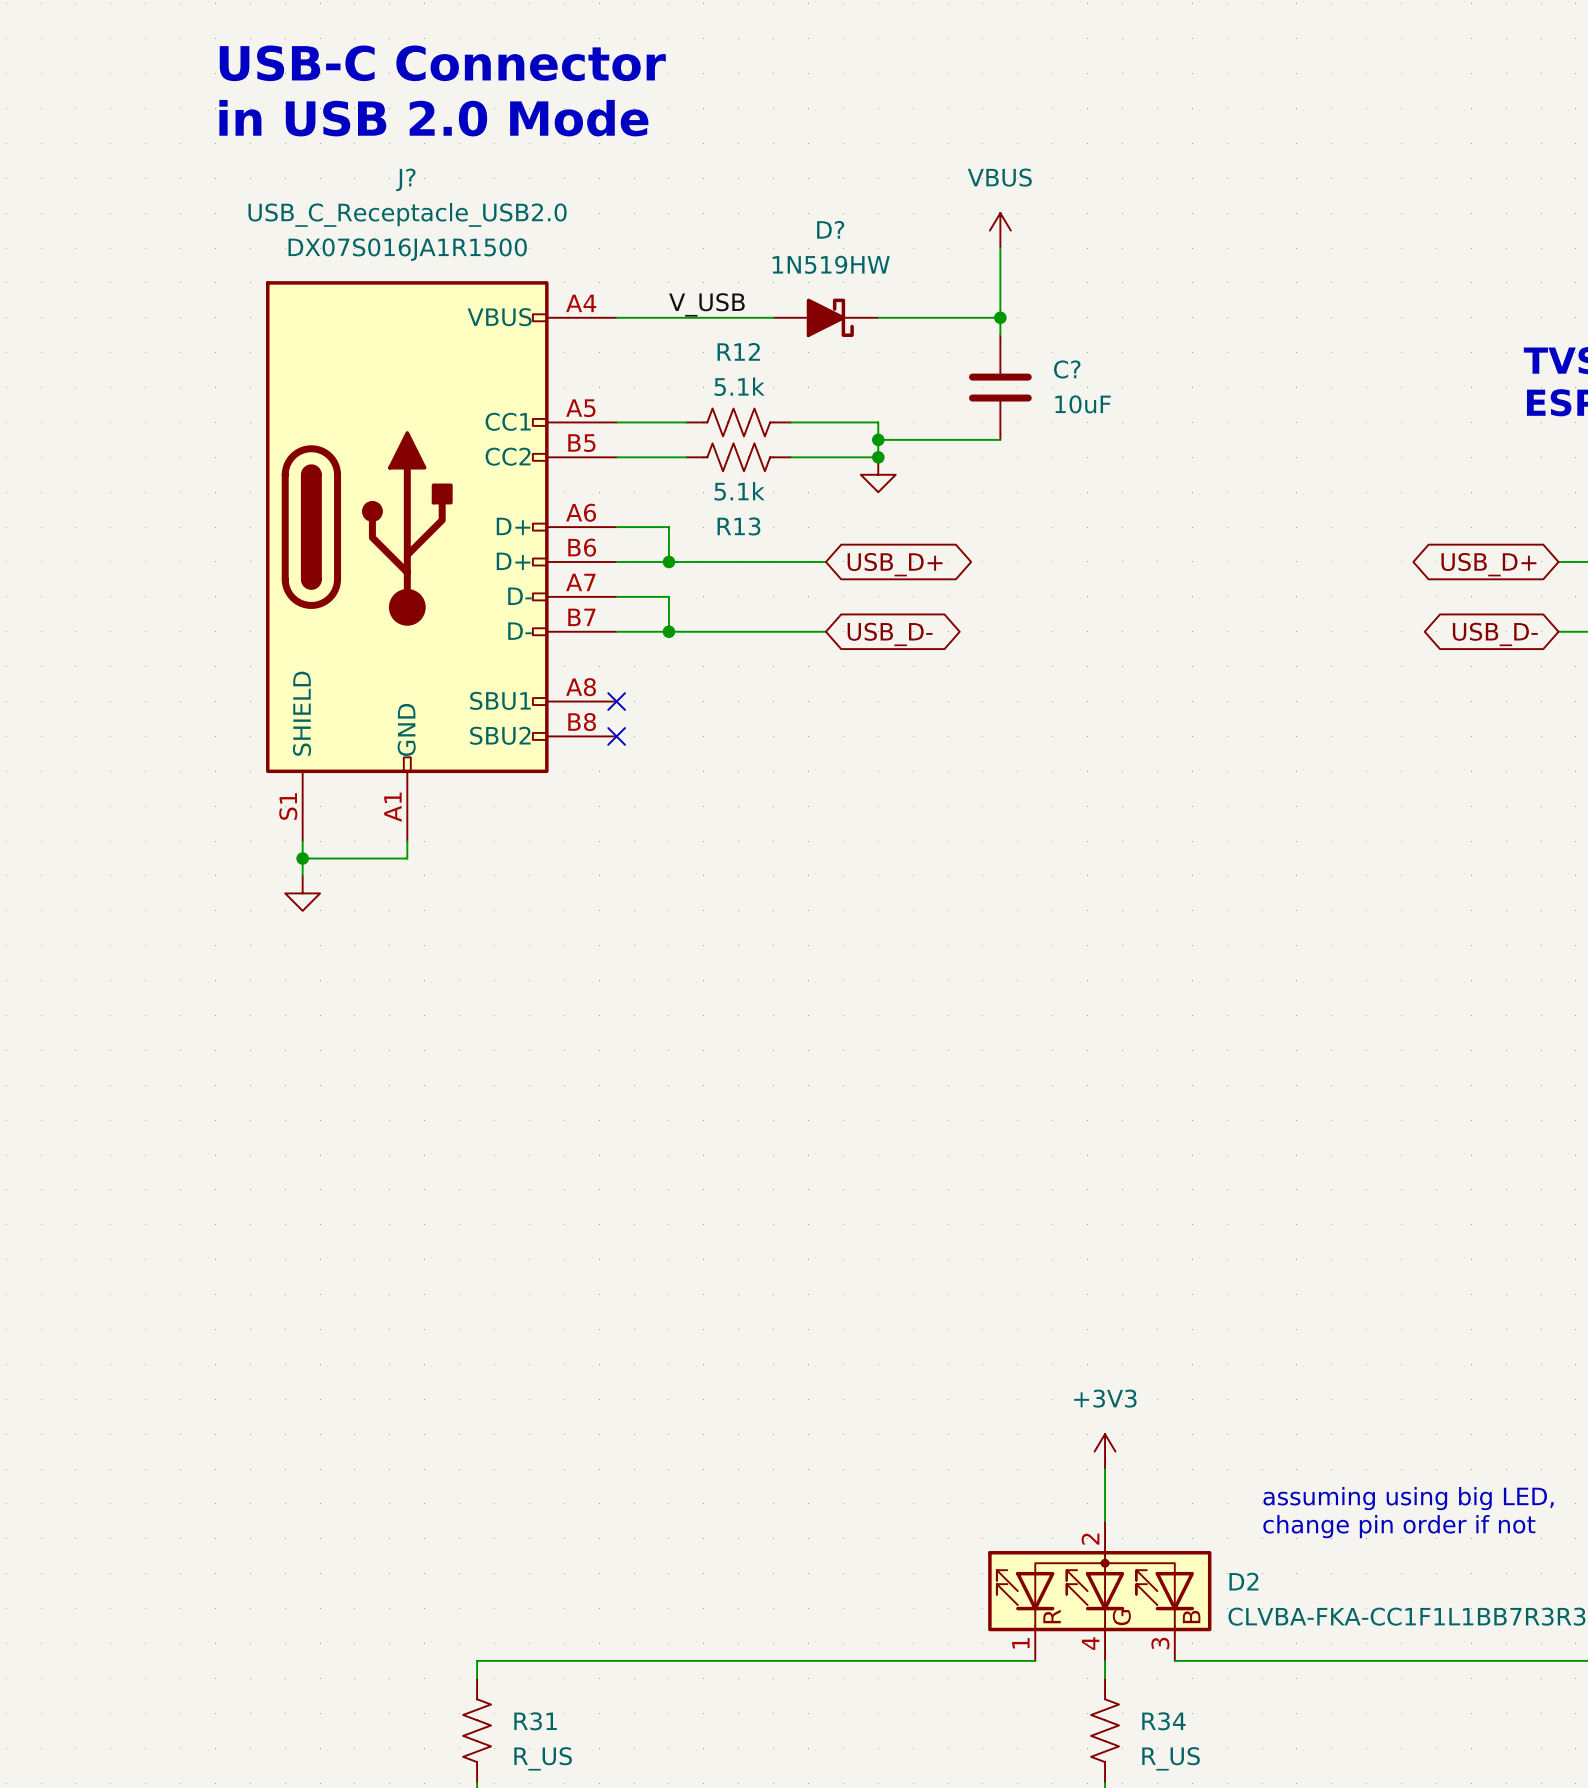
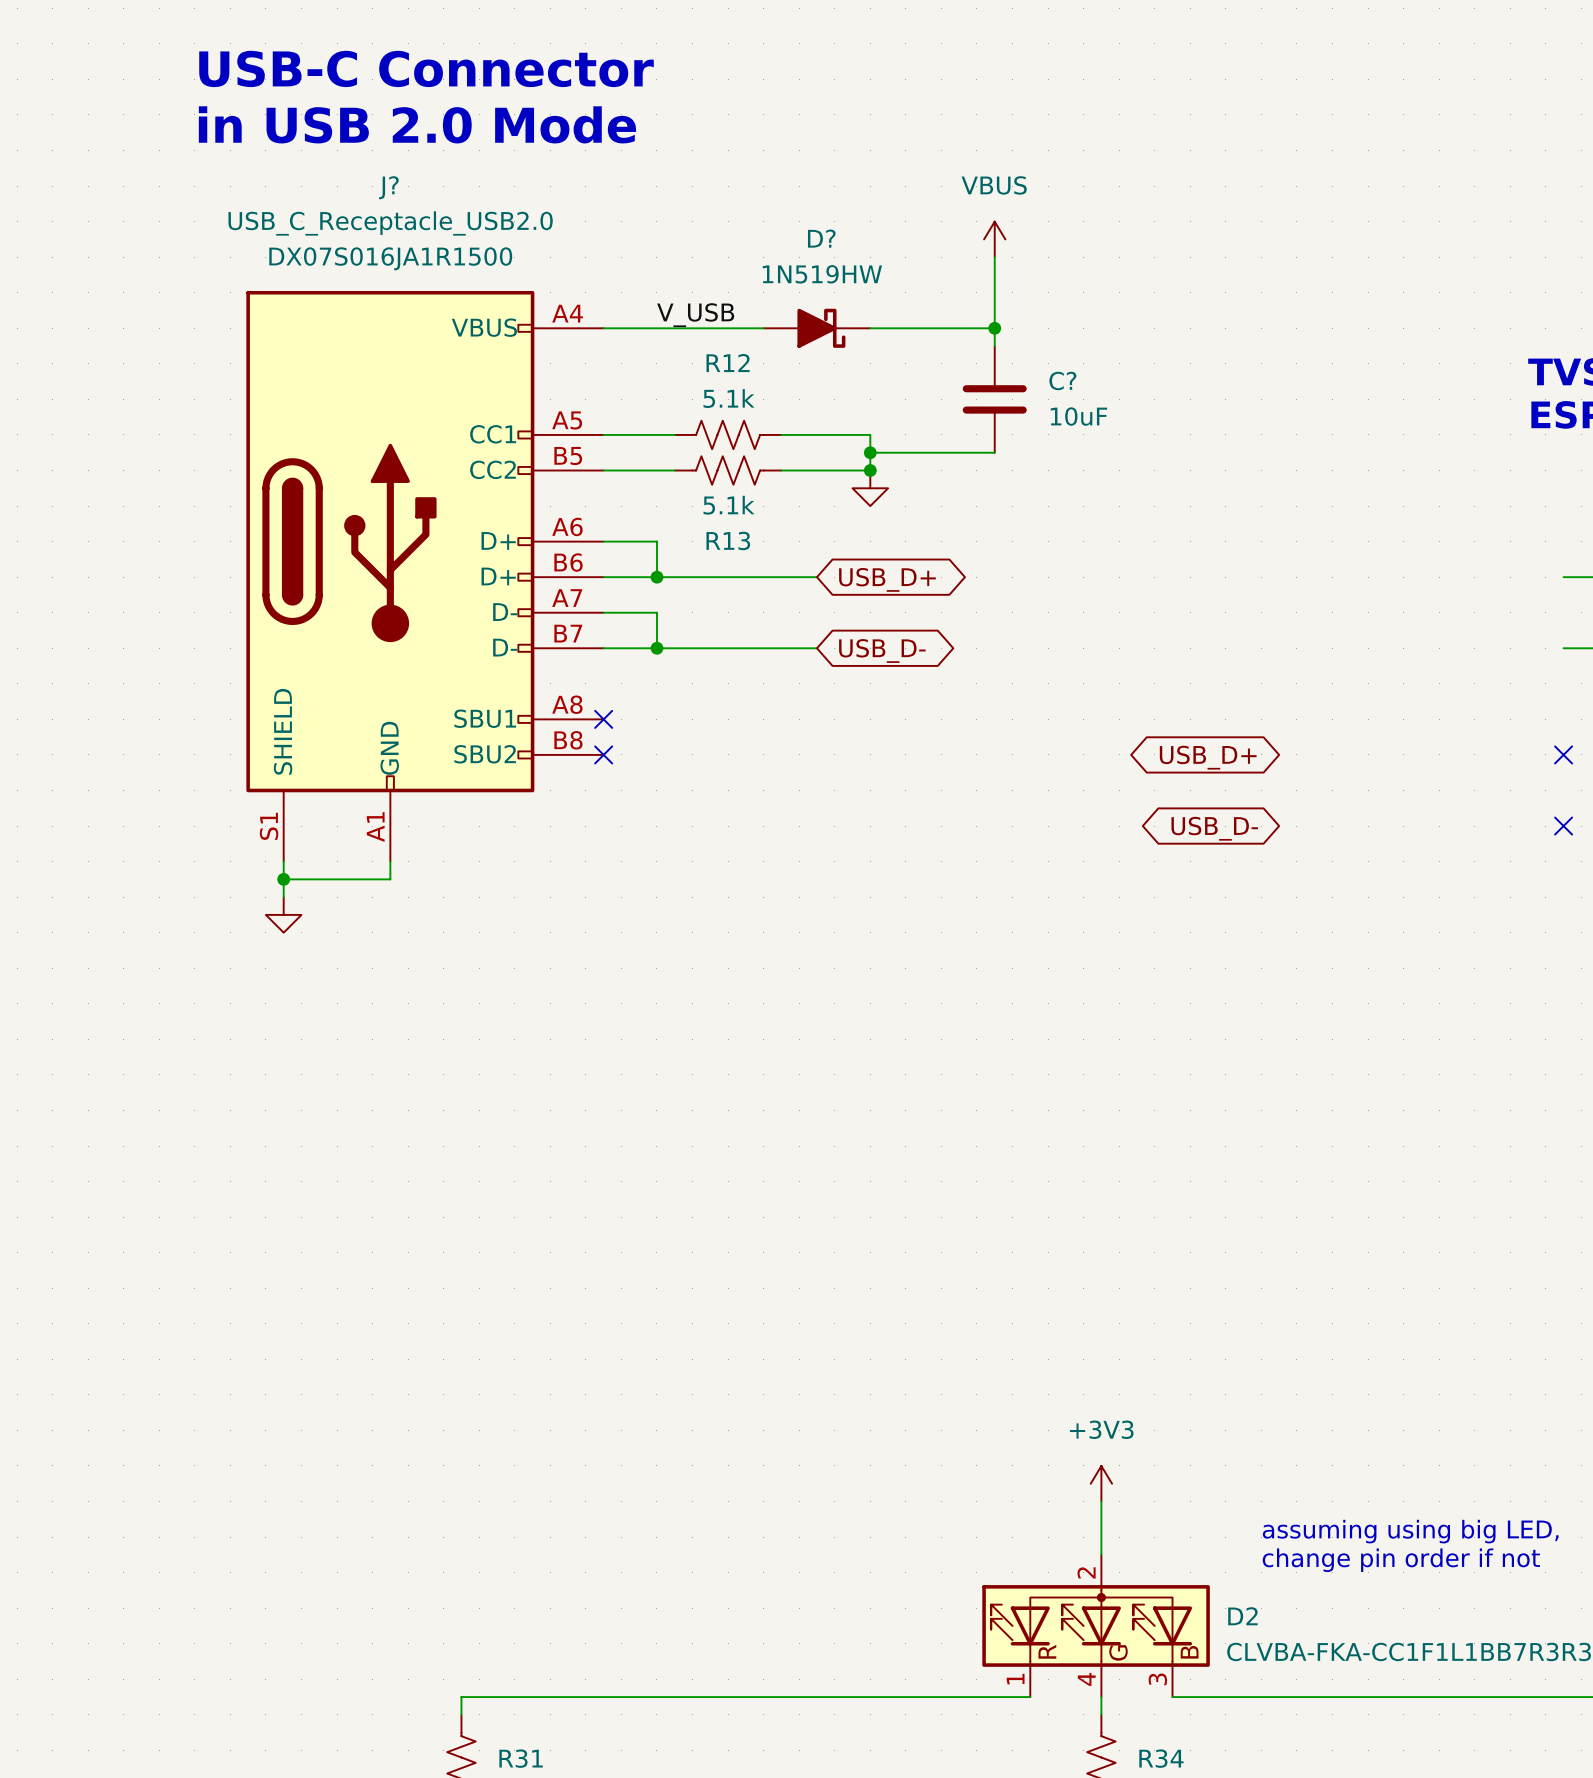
global label position: USB_D+ (1488, 564) -> USB_D+ (1208, 757)
global label position: USB_D- (1495, 634) -> USB_D- (1214, 828)
no-connect mark: none -> (1563, 754)
no-connect mark: none -> (1563, 826)

